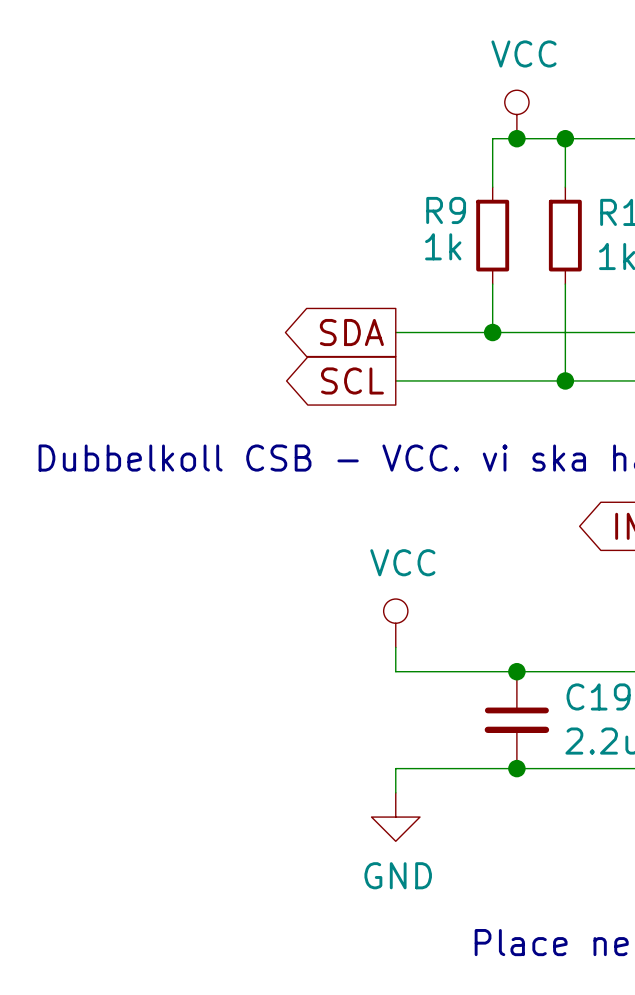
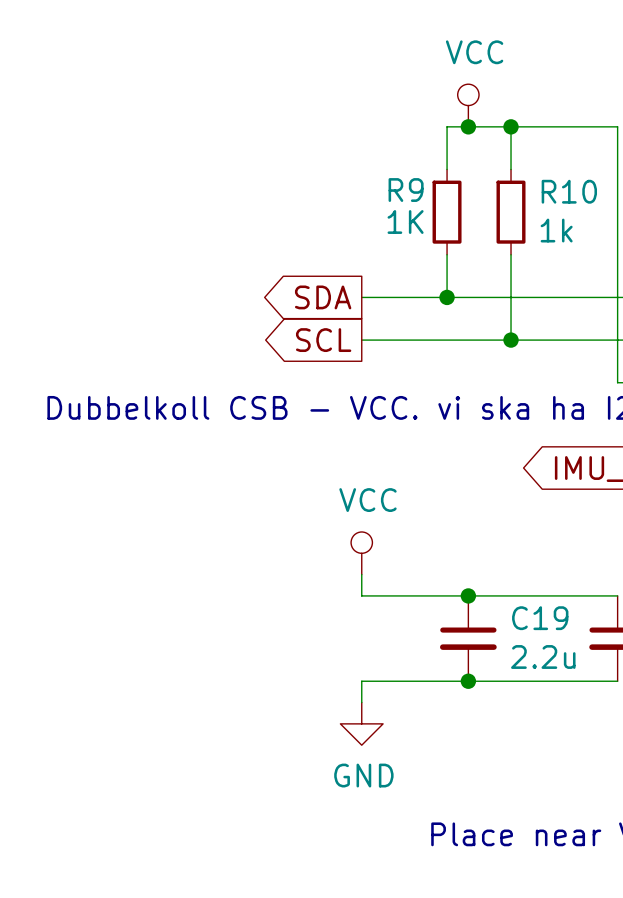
R9 value: 1k (443, 246) -> 1K (405, 222)

